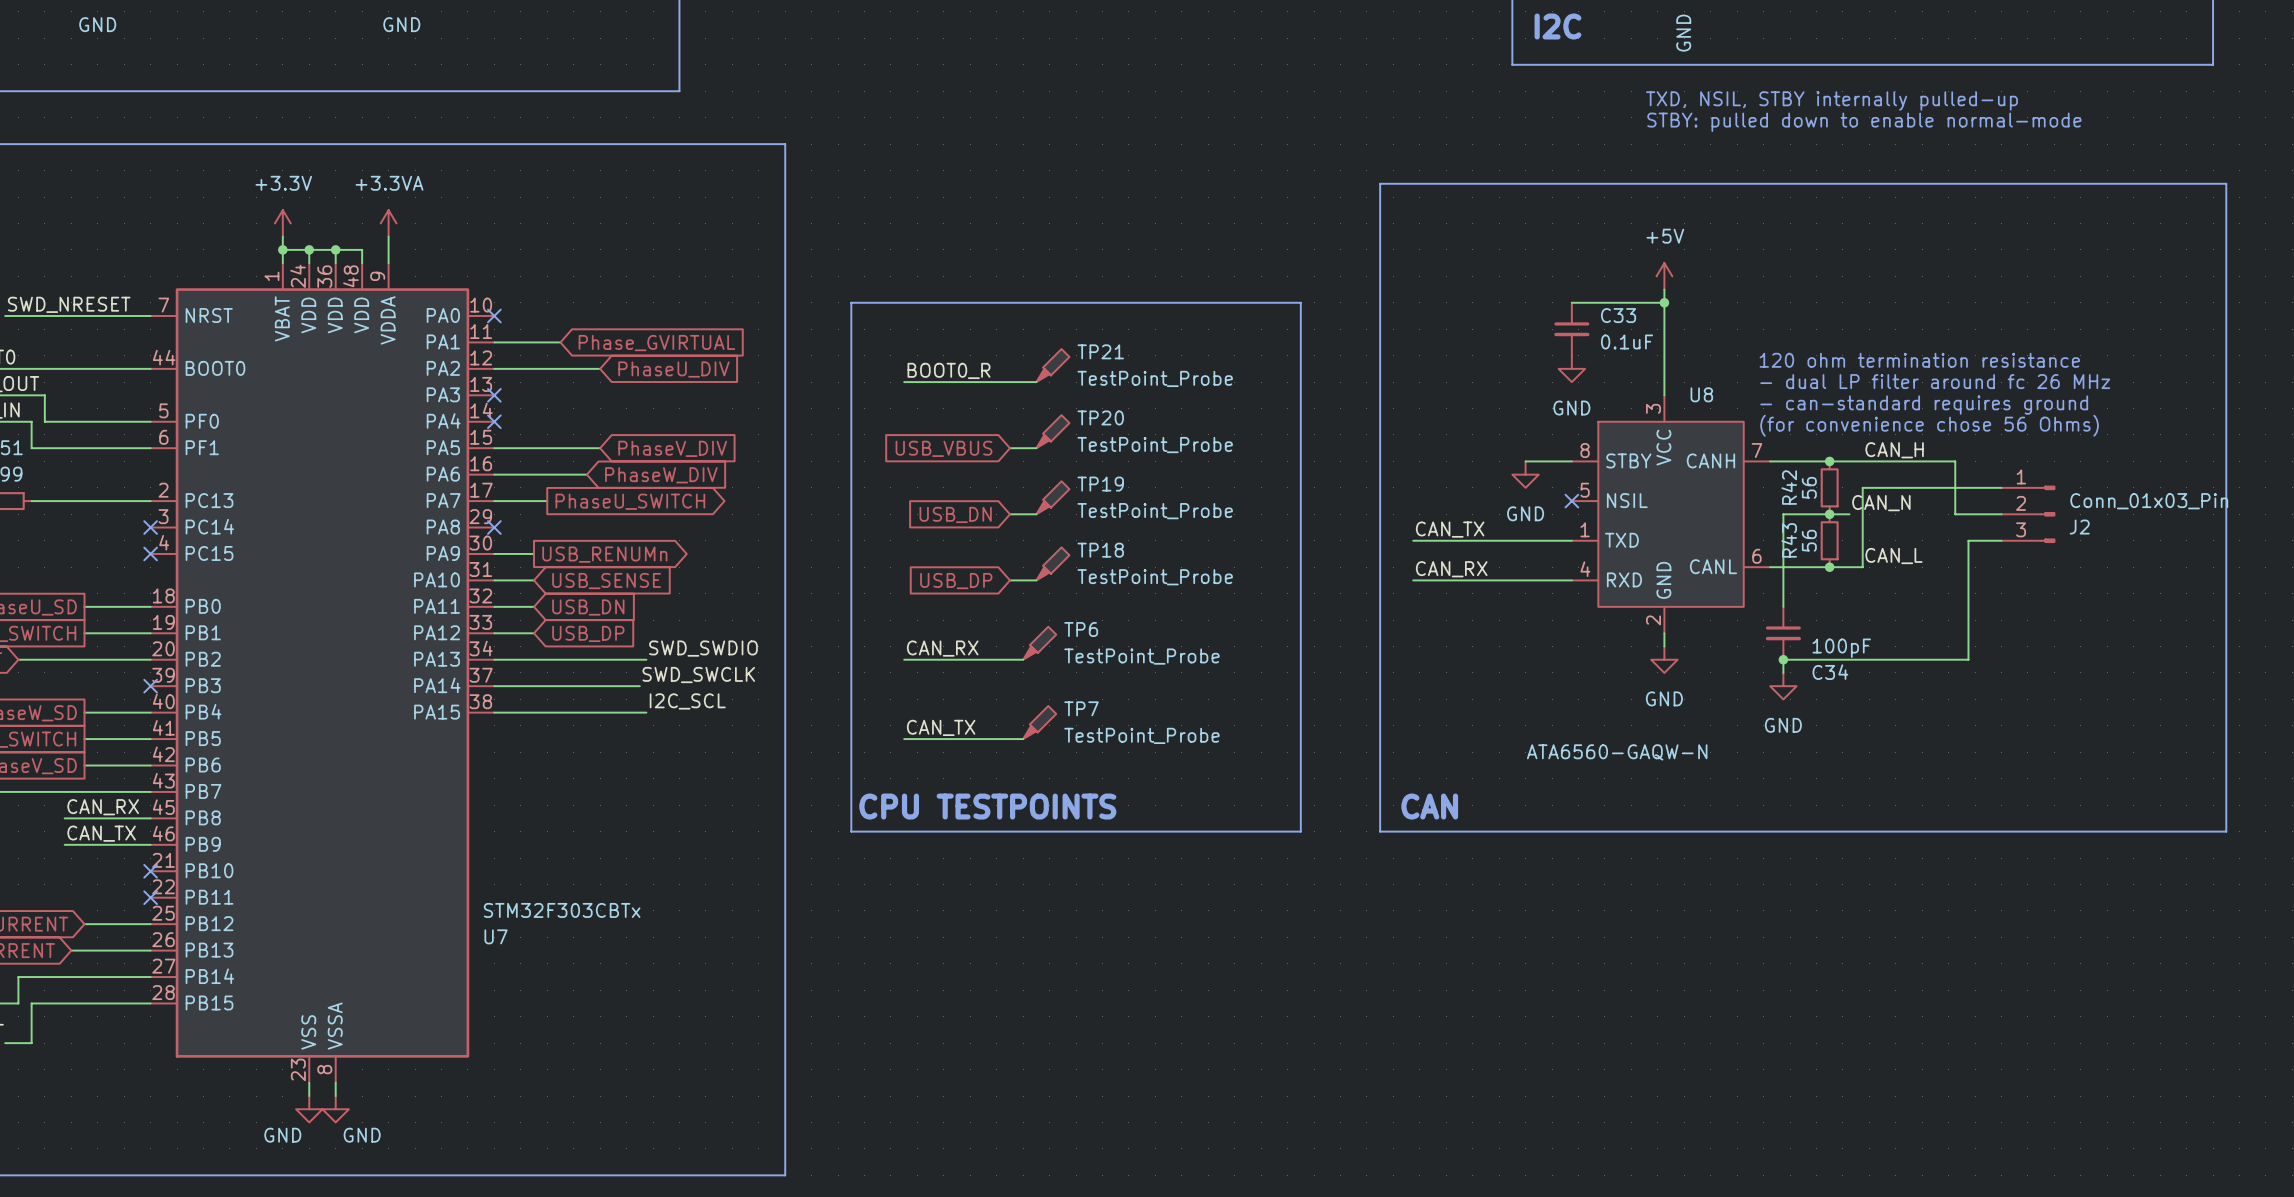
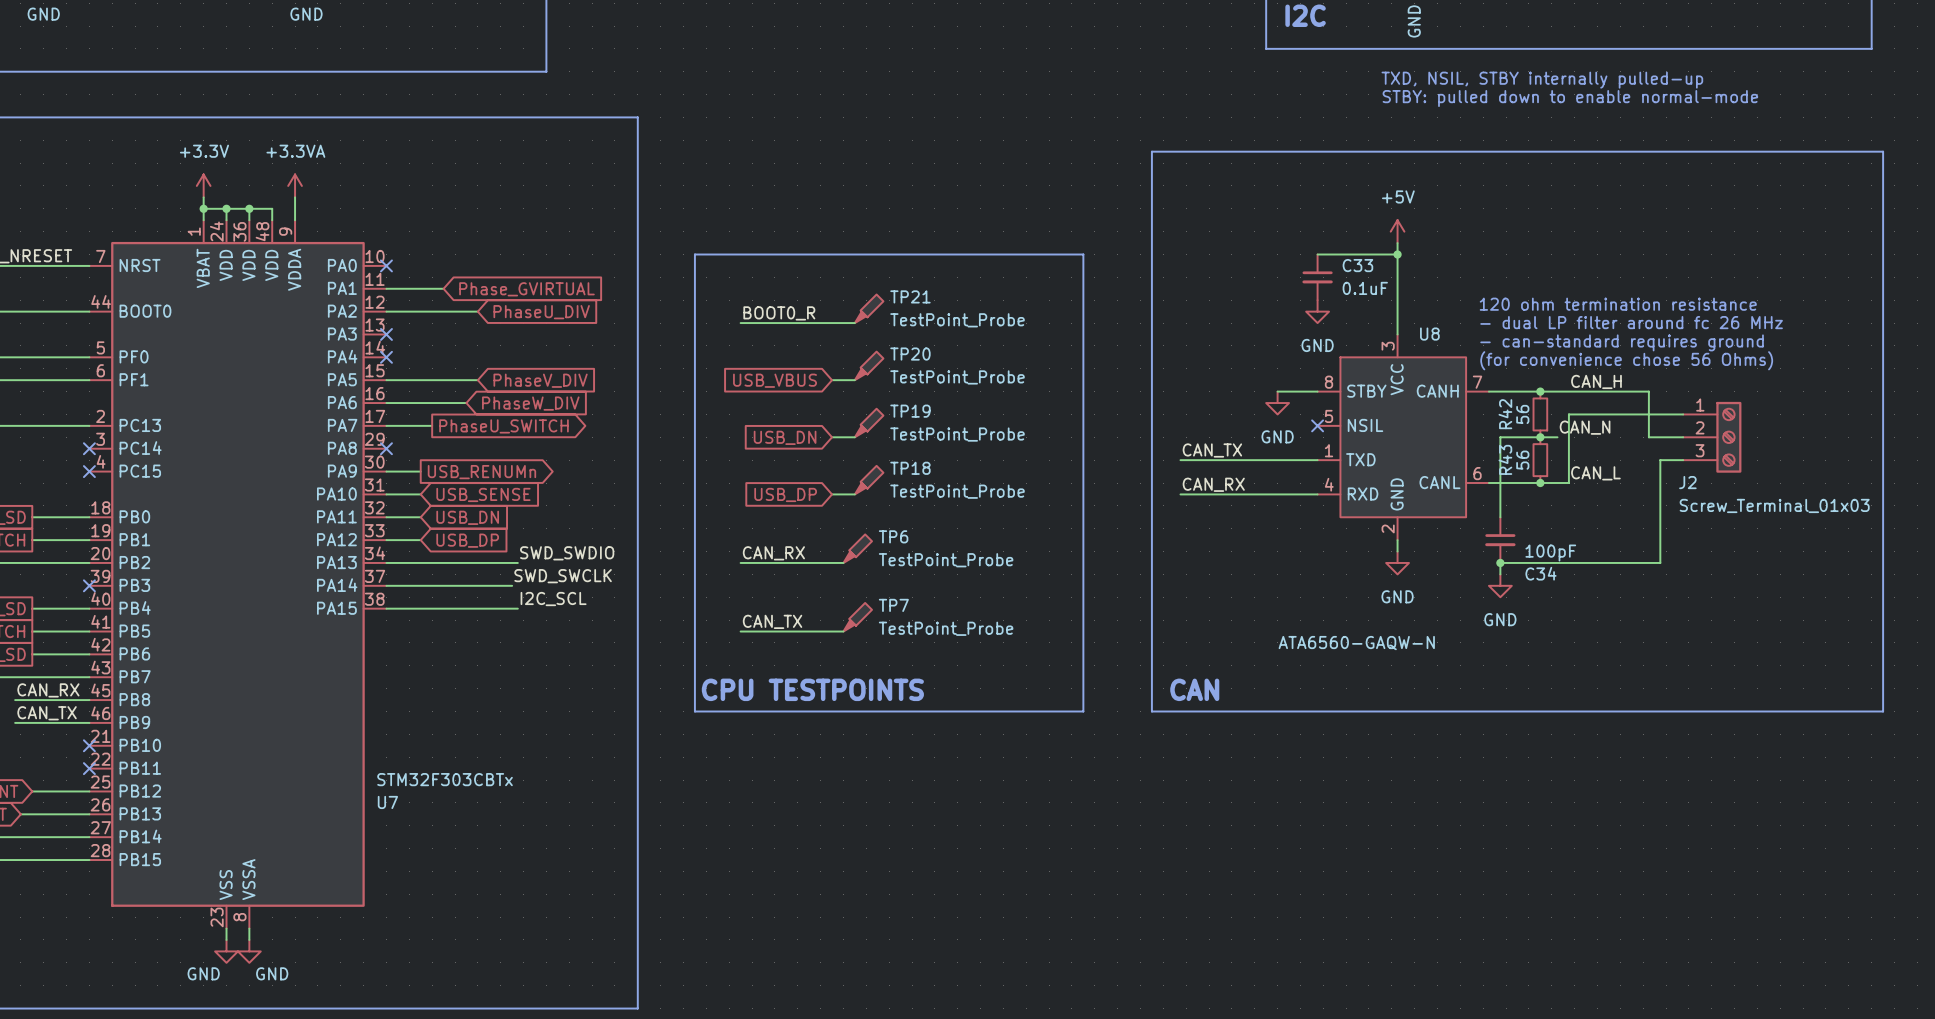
J2 symbol: [2001, 485, 2056, 543] -> [1683, 401, 1742, 473]
J2 value: Conn_01x03_Pin (2149, 501) -> Screw_Terminal_01x03 (1774, 505)
J2 name position: J2 (2079, 527) -> J2 (1687, 482)

